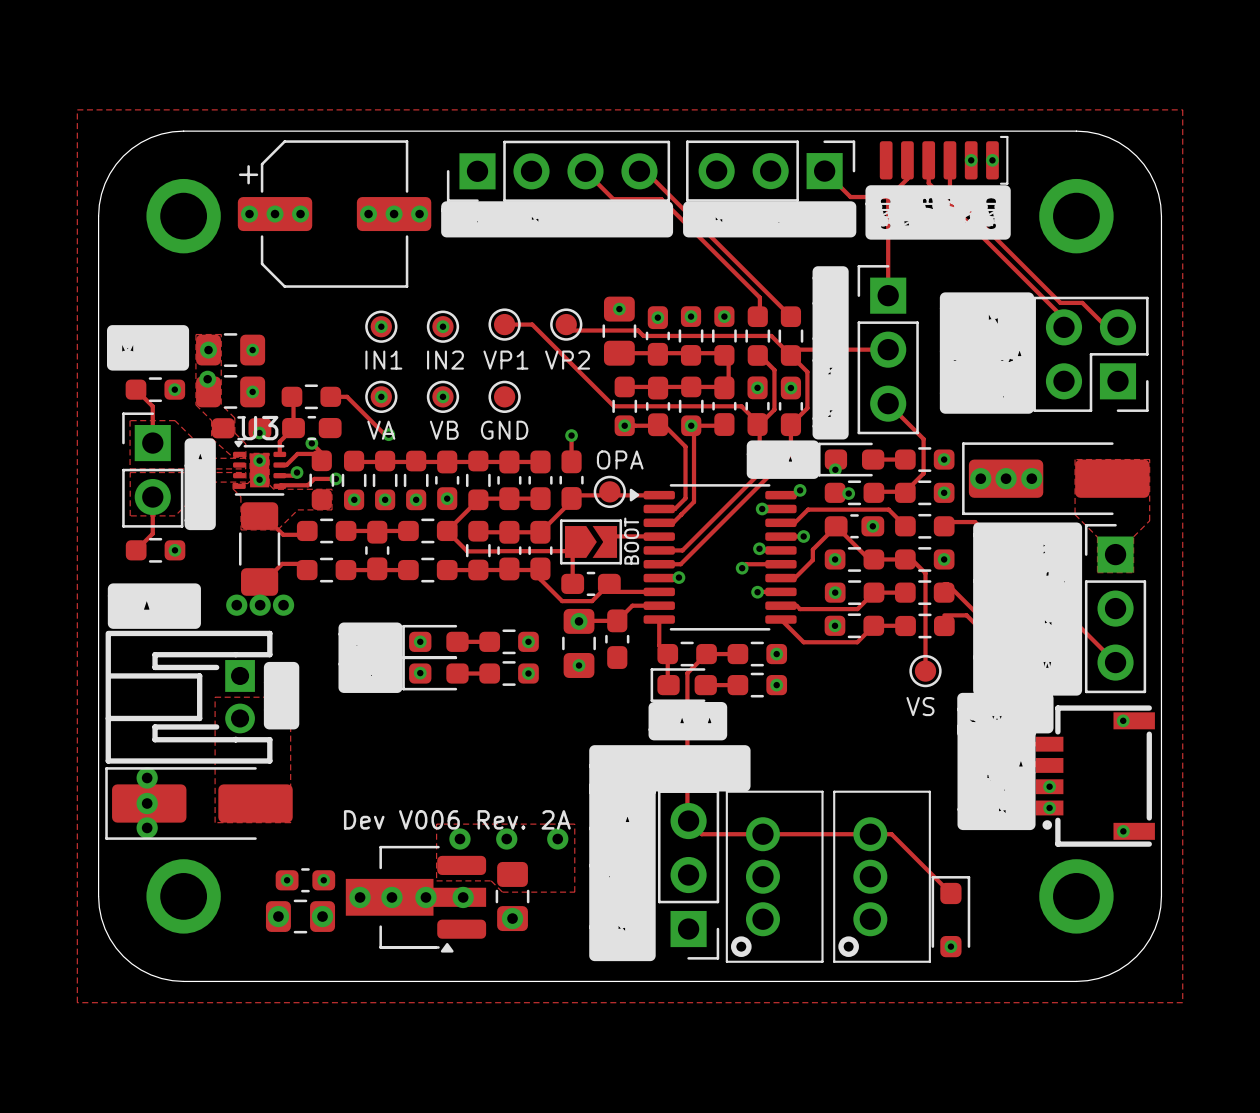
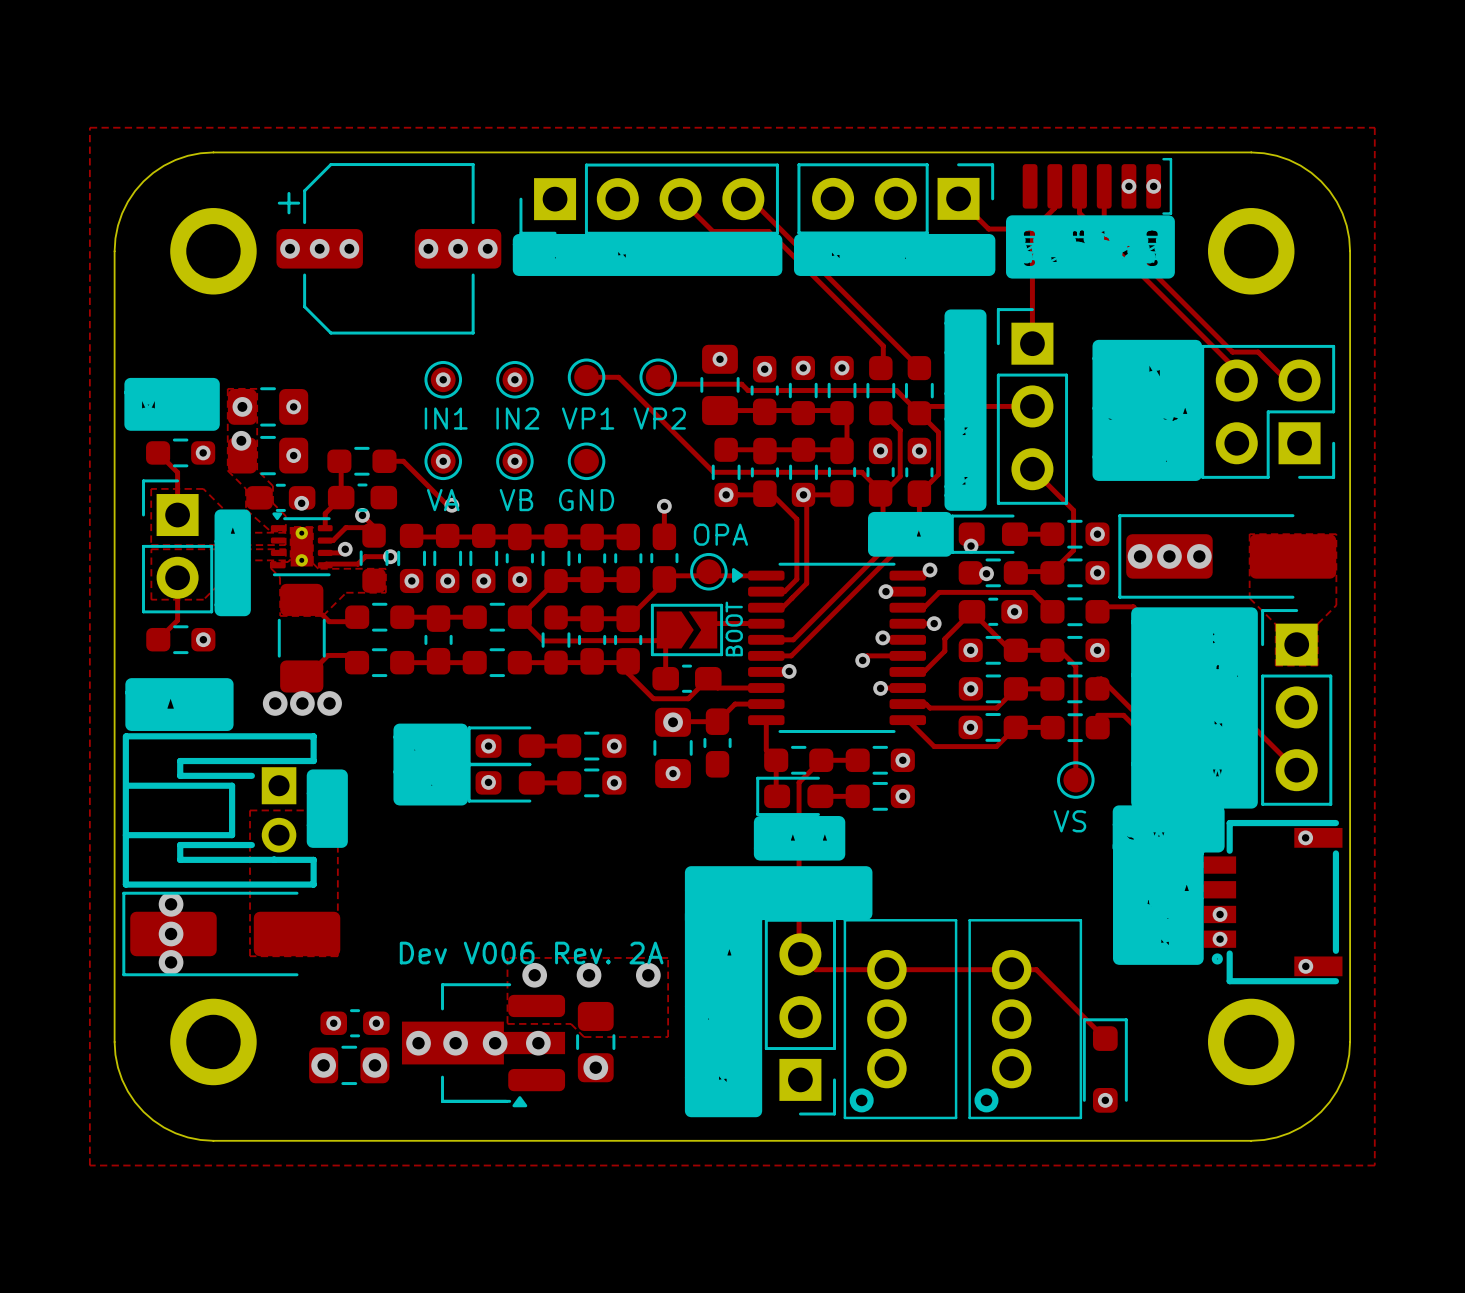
via: (259, 460) -> none
U3: (259, 468) -> none
part: none -> (301, 544)
via: (259, 479) -> none

